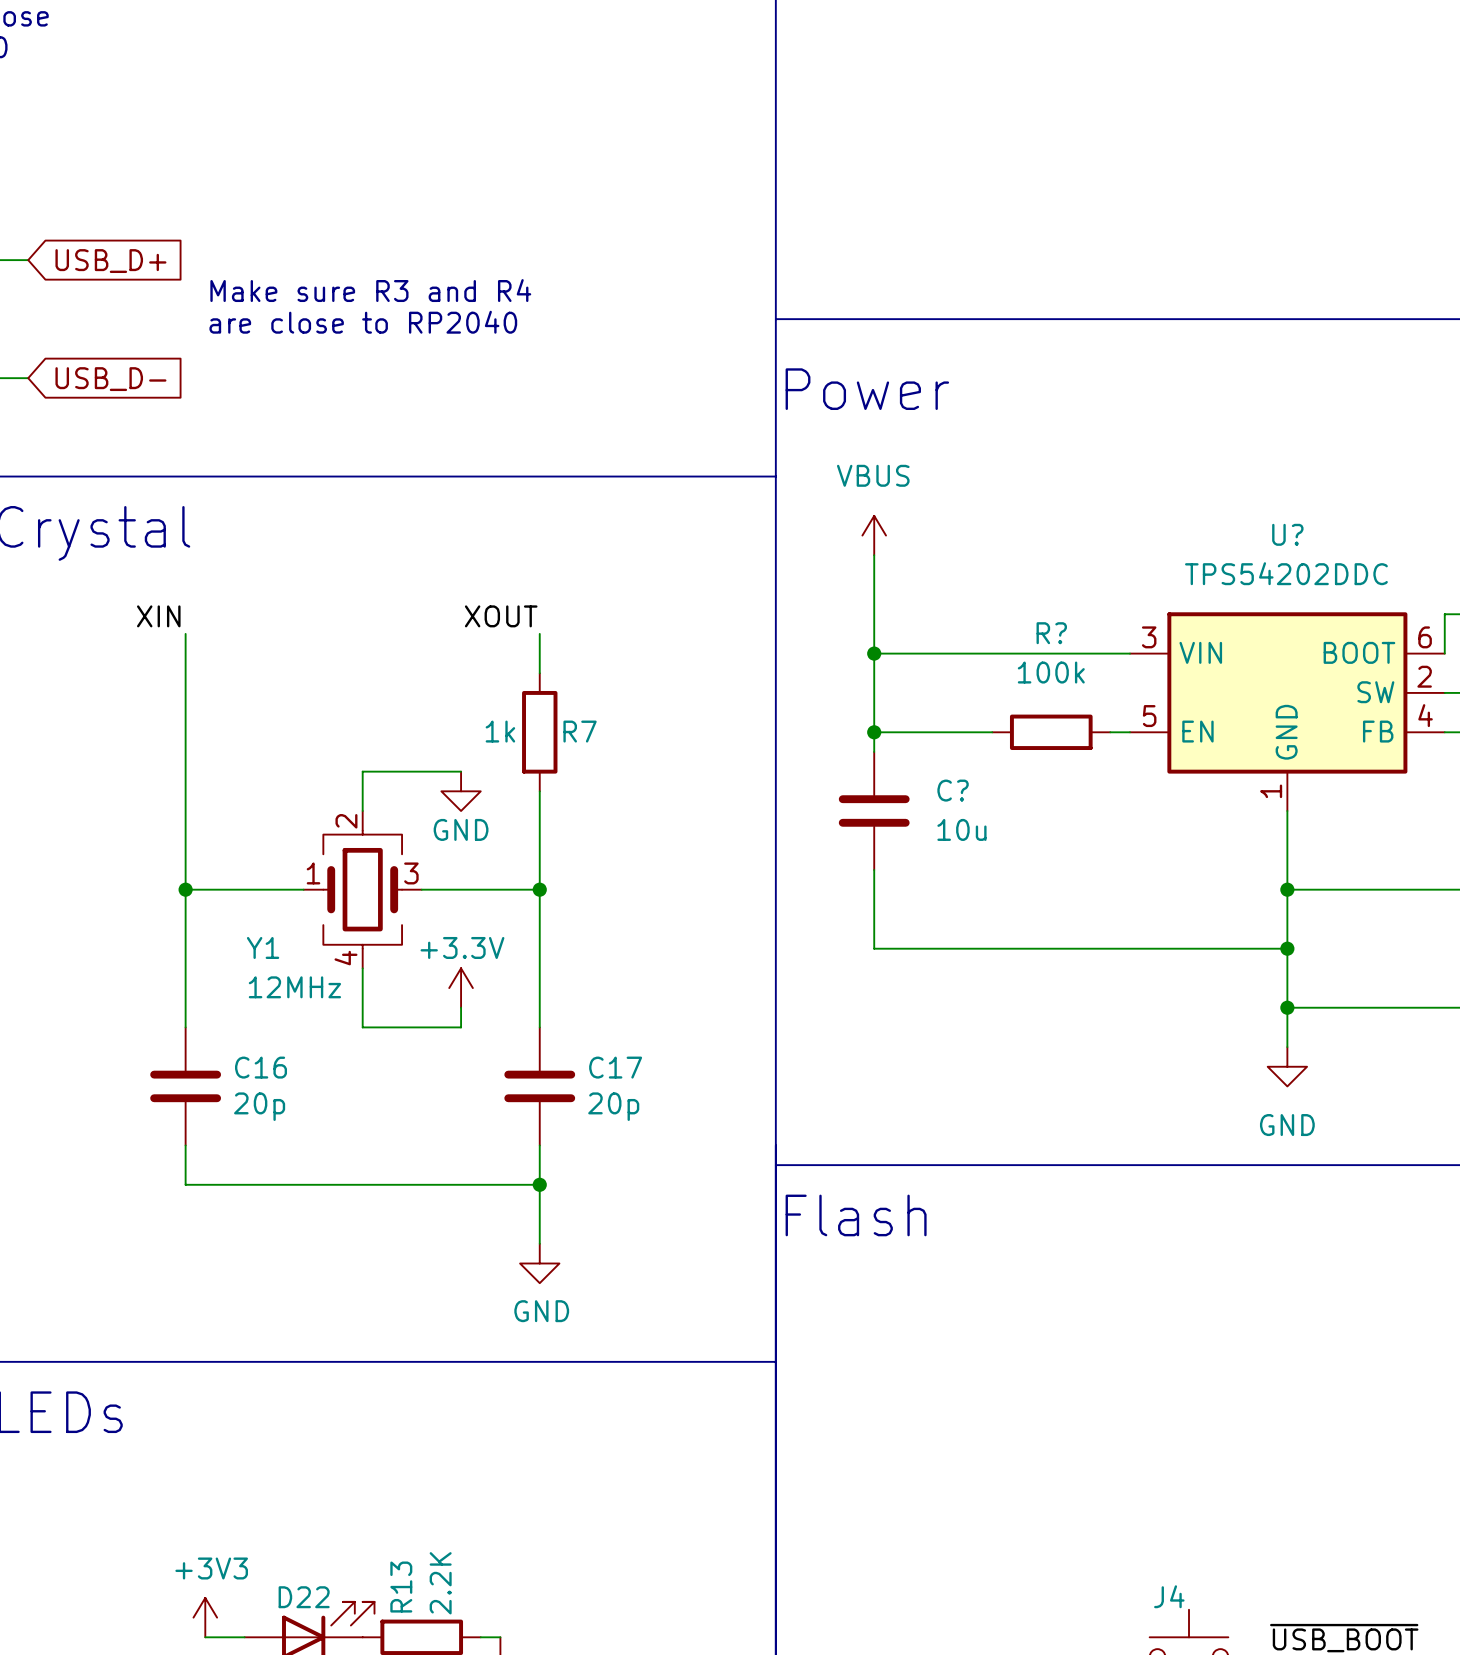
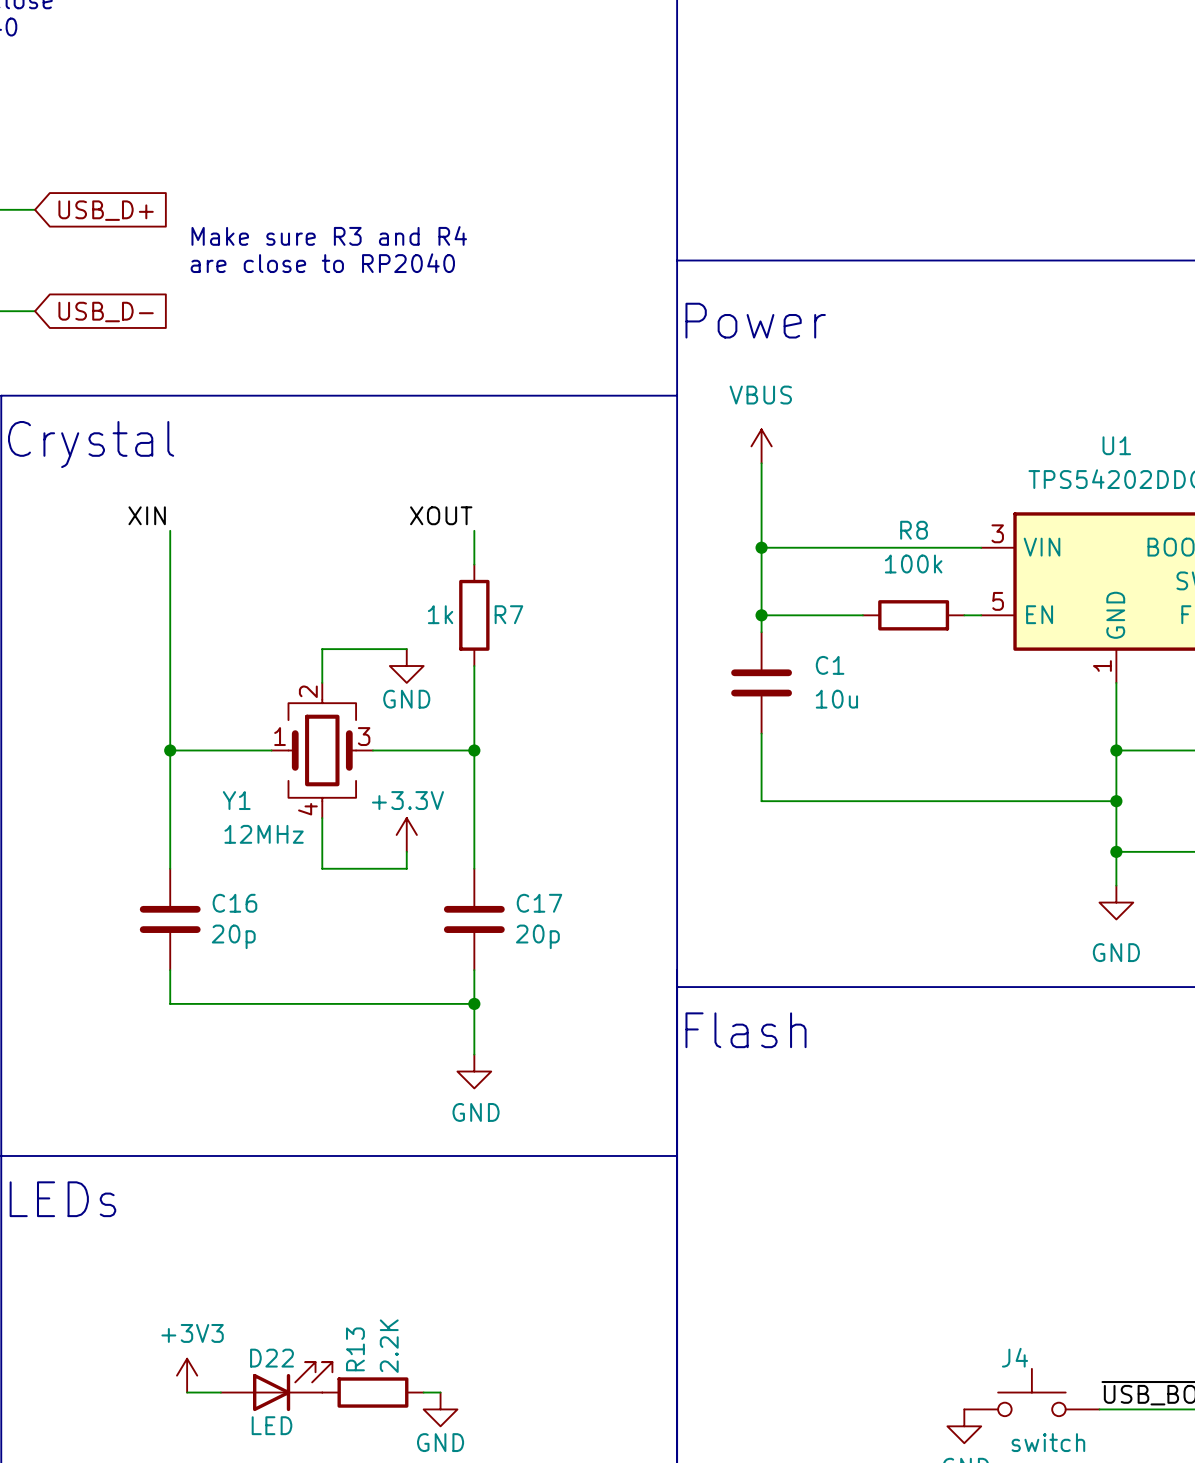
U? name: U? (1287, 534) -> U1 (1116, 445)
R? name: R? (1051, 633) -> R8 (914, 530)
C? name: C? (953, 790) -> C1 (830, 665)

